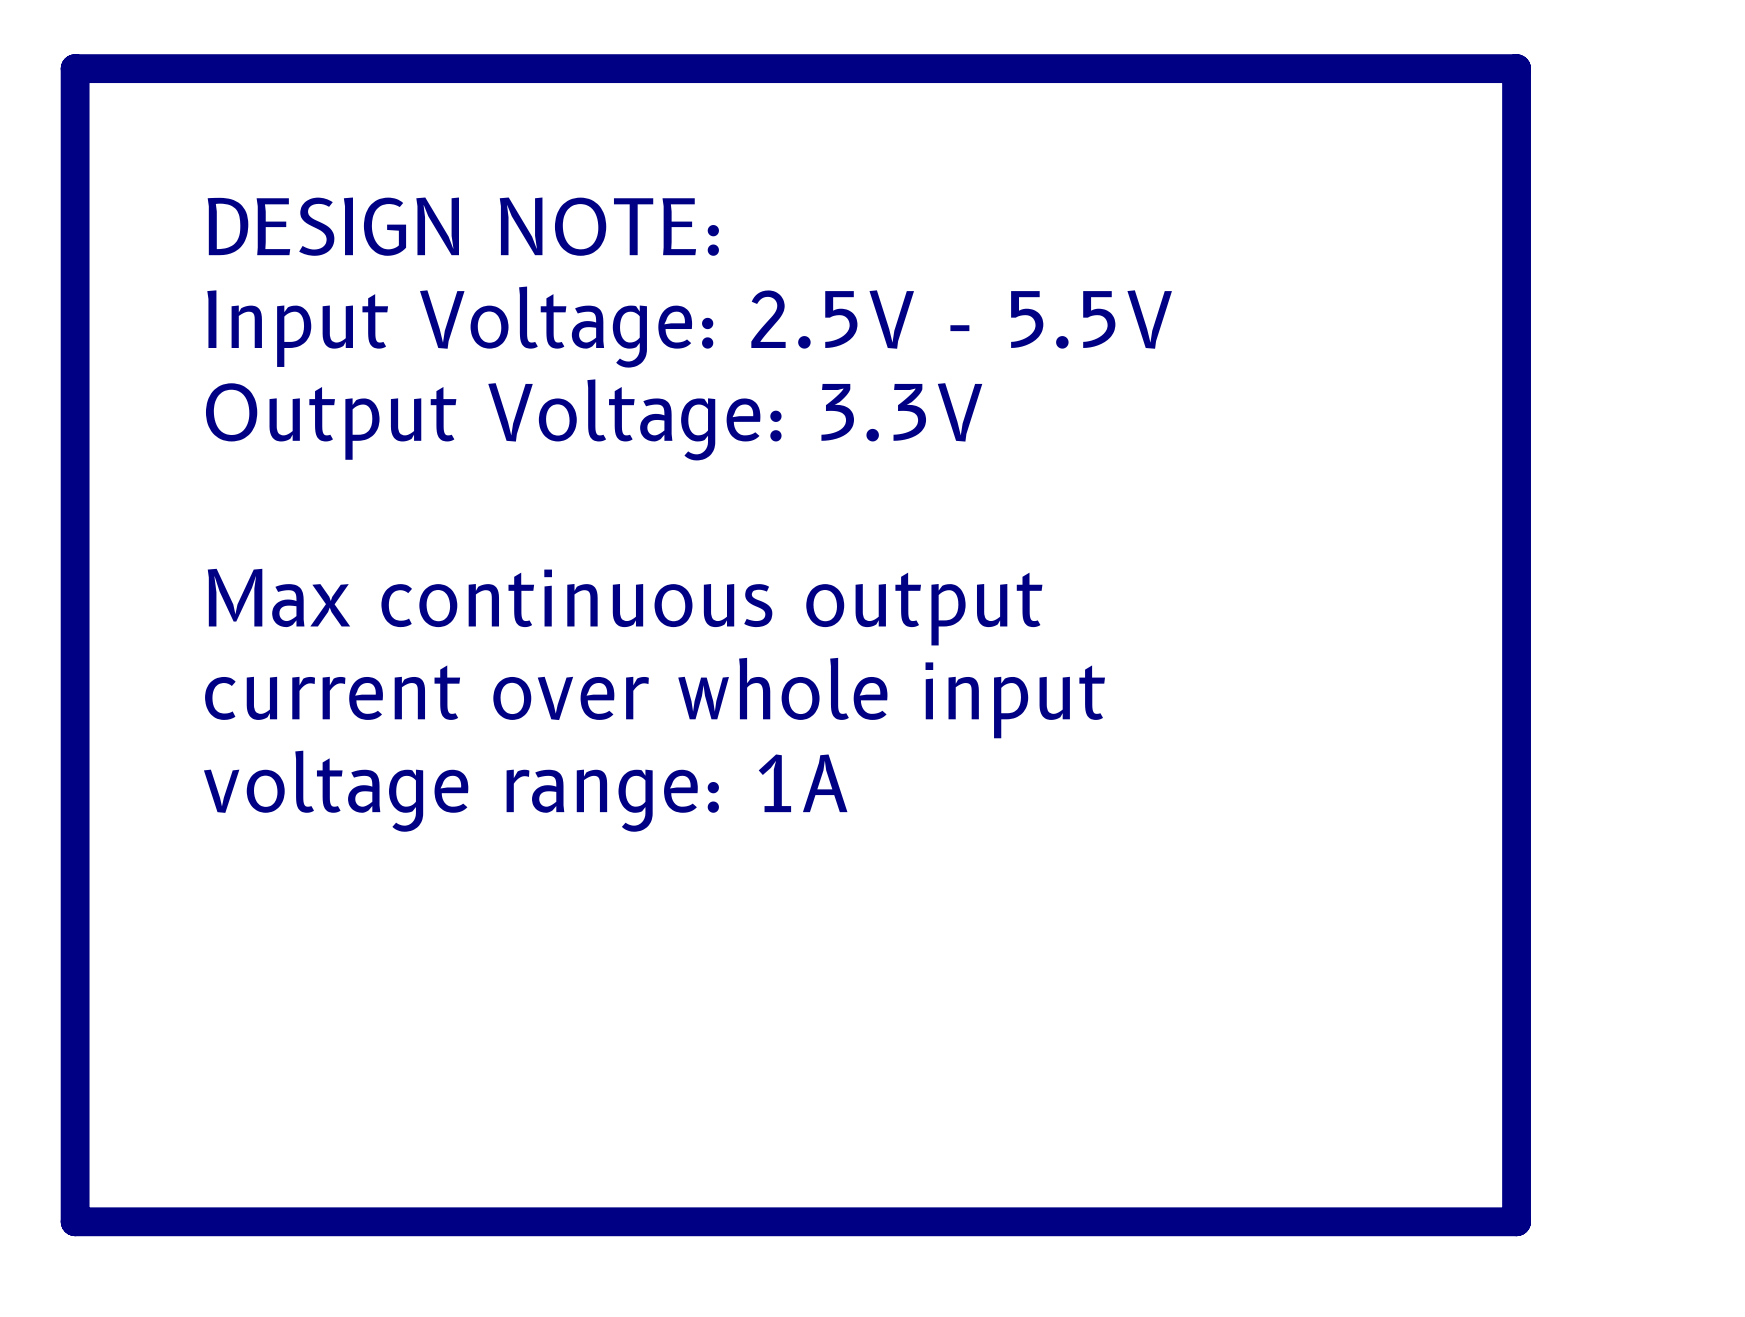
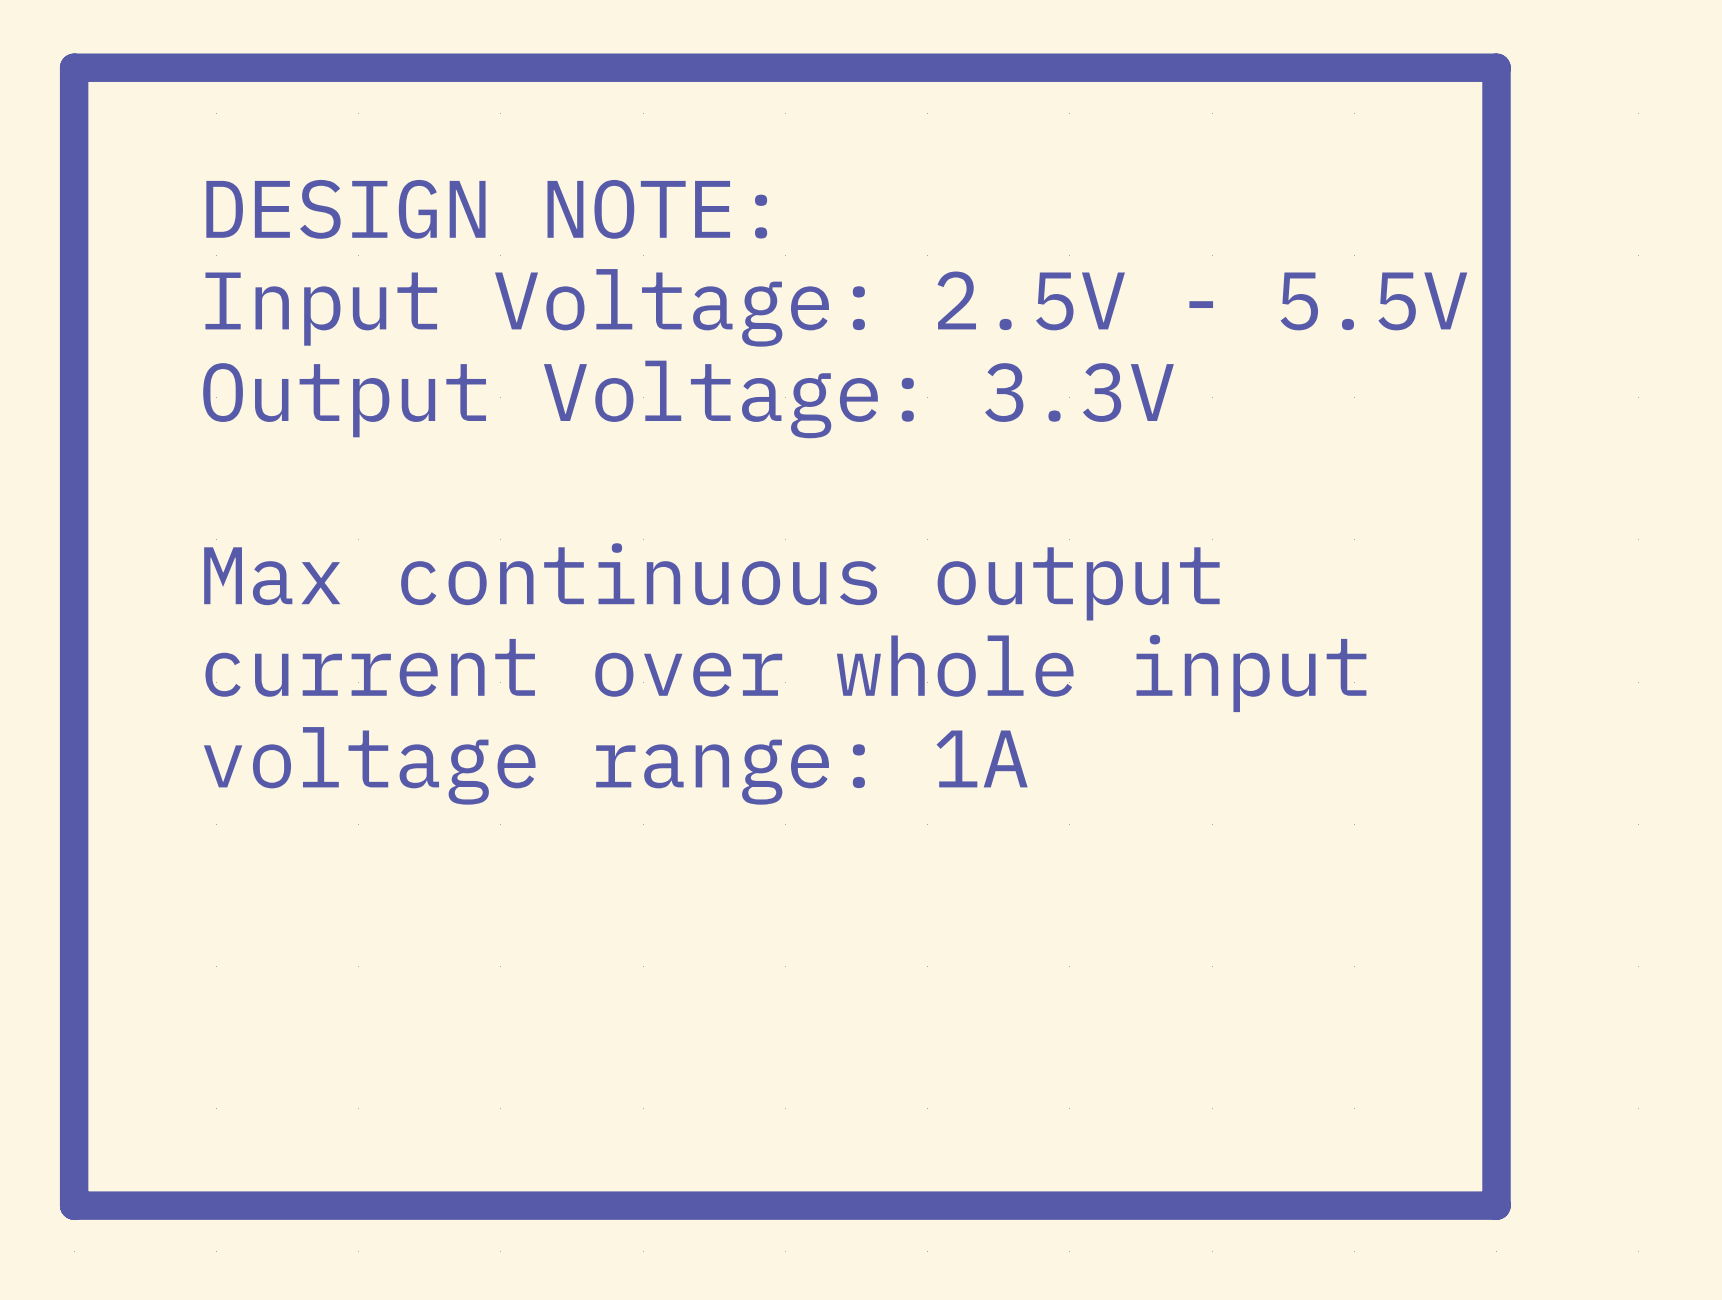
text position: DESIGN NOTE: (463, 226) -> DESIGN NOTE: (486, 209)
text position: Input Voltage: 2.5V - 5.5V (689, 327) -> Input Voltage: 2.5V - 5.5V (836, 307)
text position: Output Voltage: 3.3V (594, 419) -> Output Voltage: 3.3V (688, 399)
text position: Max continuous output (625, 607) -> Max continuous output (711, 581)
text position: current over whole input (655, 698) -> current over whole input (785, 673)
text position: voltage range: 1A (525, 791) -> voltage range: 1A (615, 765)

